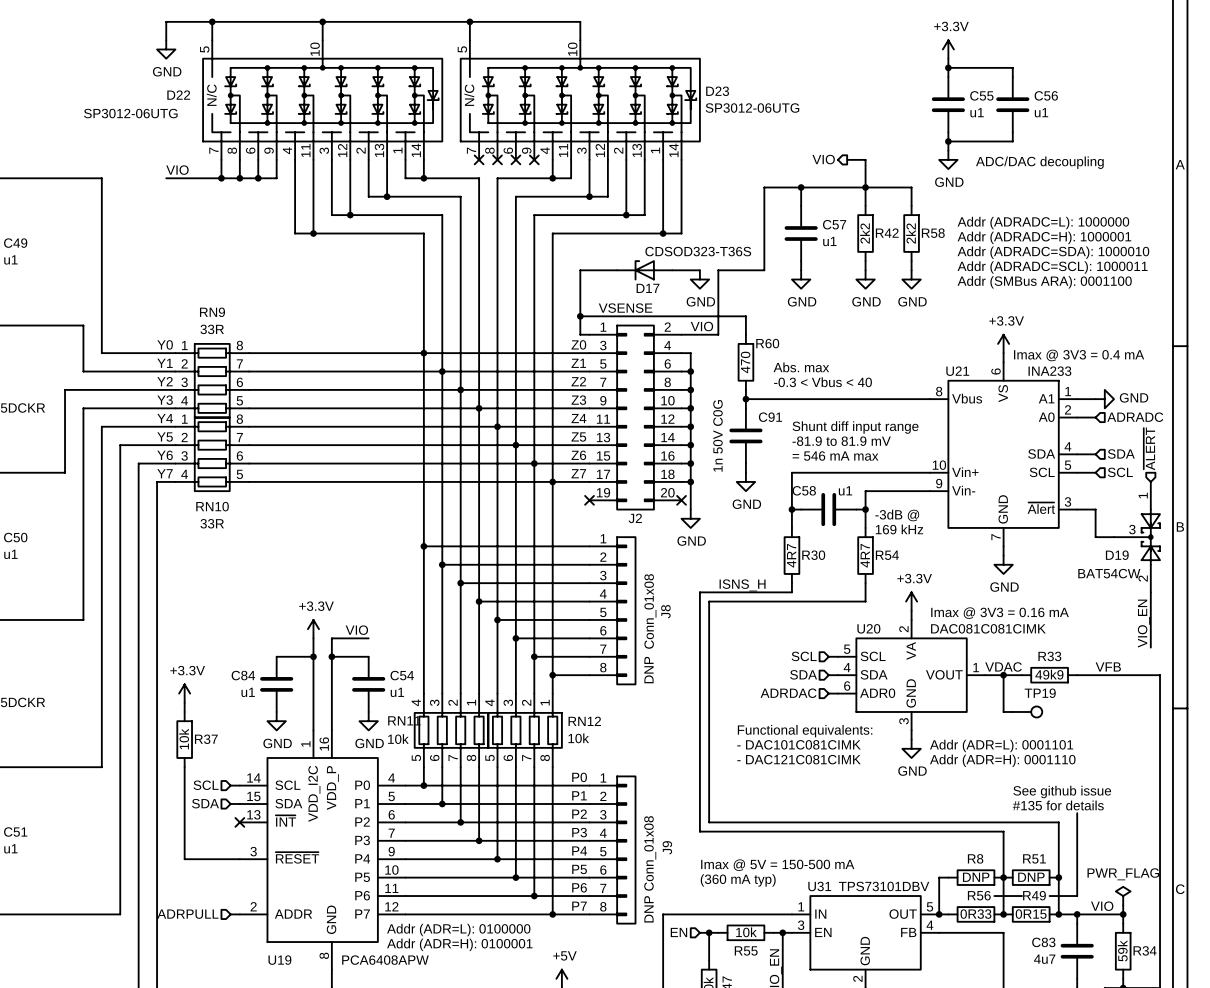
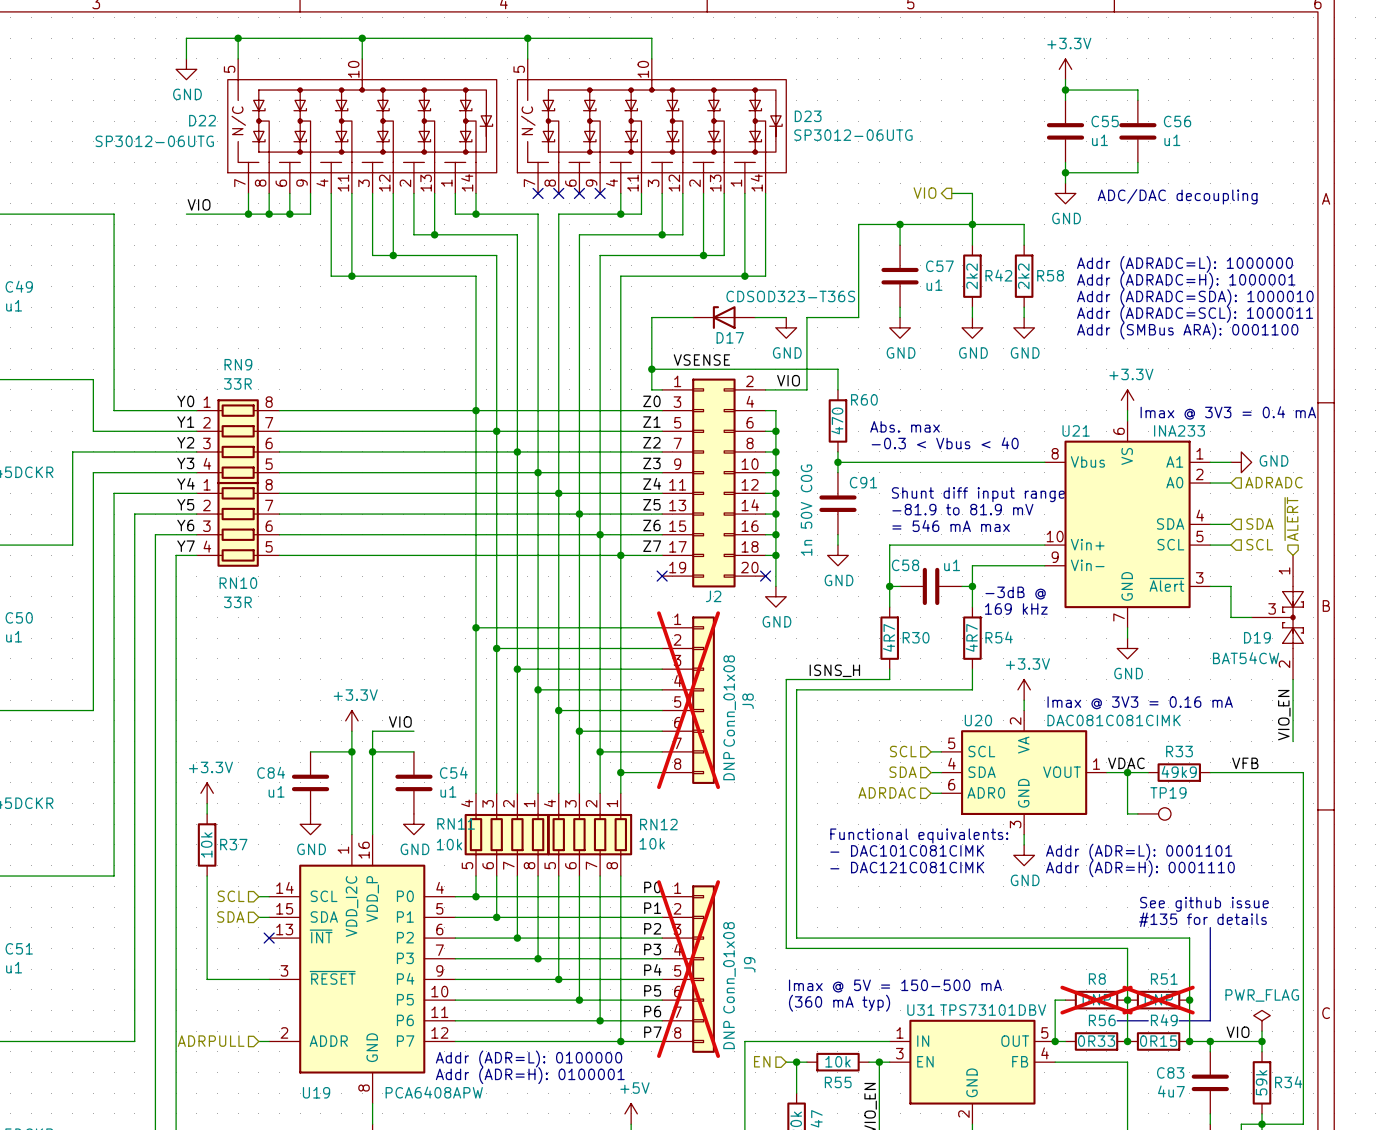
J8 do-not-place cross: none -> (688, 700)
J9 do-not-place cross: none -> (688, 969)
R8 do-not-place cross: none -> (1096, 1000)
R51 do-not-place cross: none -> (1158, 1000)

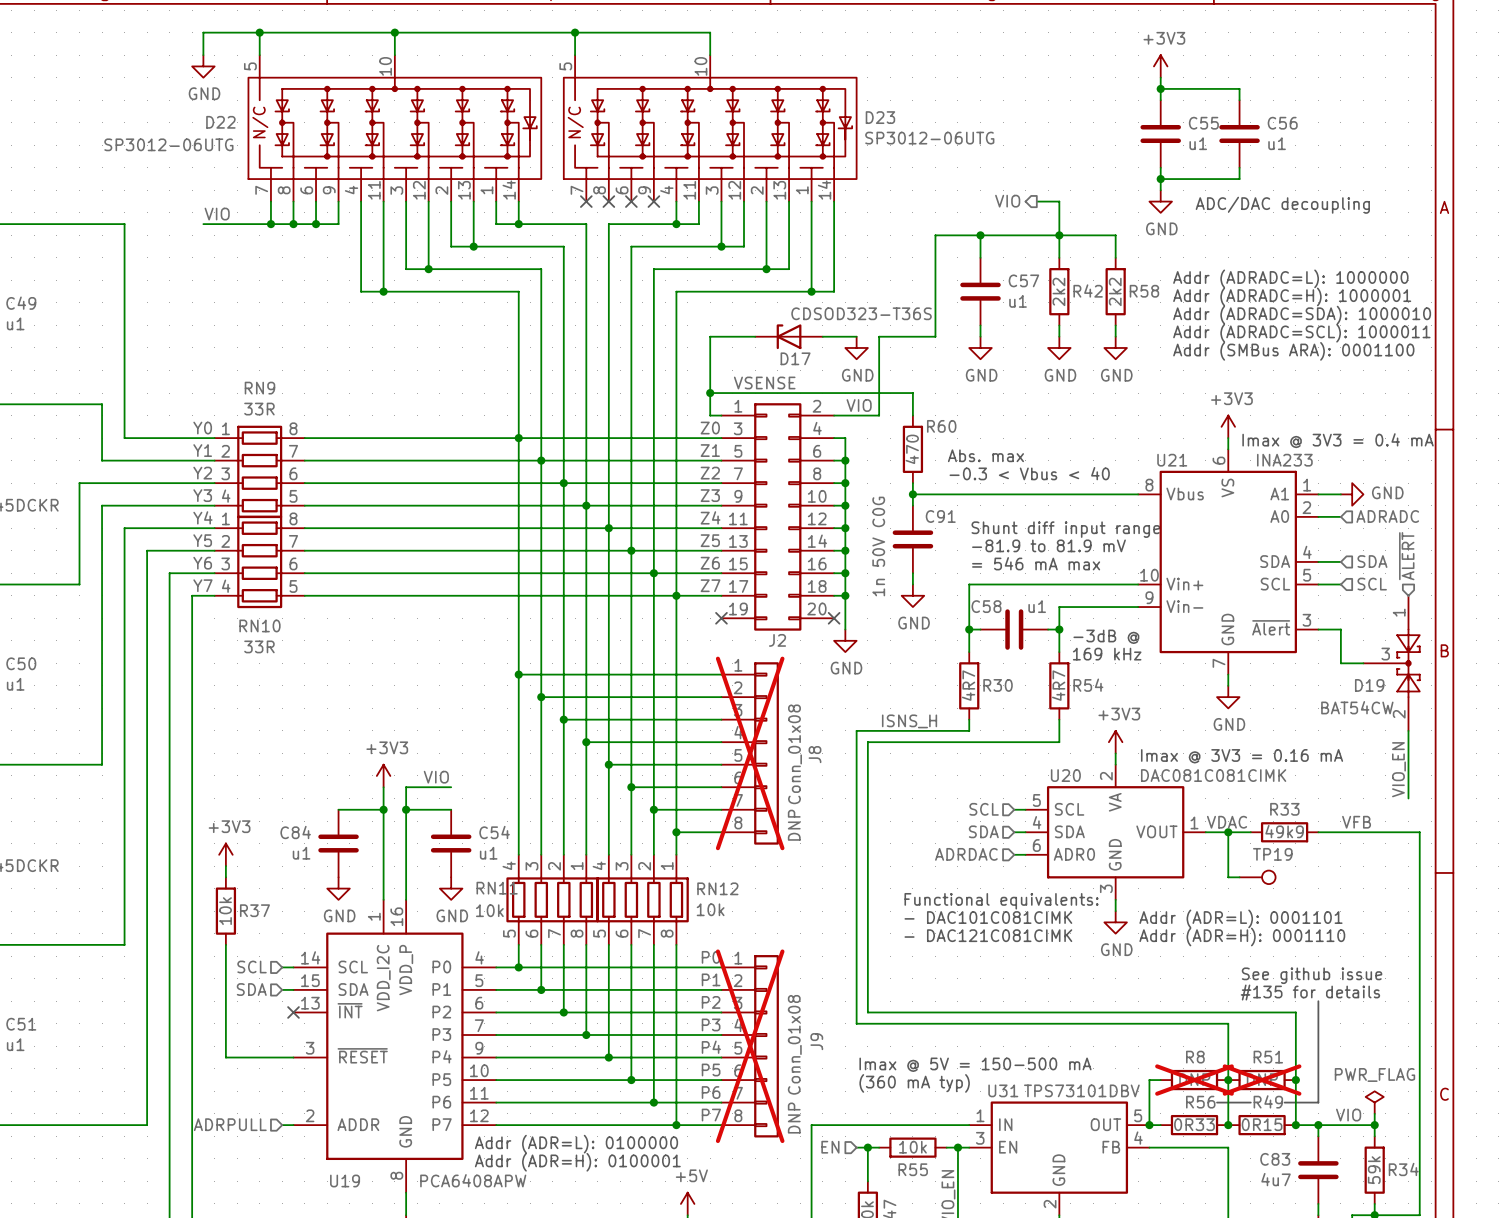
power symbol: +3.3V (1065, 69) -> +3V3 (1160, 66)
power symbol: +3.3V (1127, 400) -> +3V3 (1228, 426)
power symbol: +3.3V (1024, 689) -> +3V3 (1115, 742)
power symbol: +3.3V (351, 720) -> +3V3 (383, 775)
power symbol: +3.3V (207, 793) -> +3V3 (225, 854)

